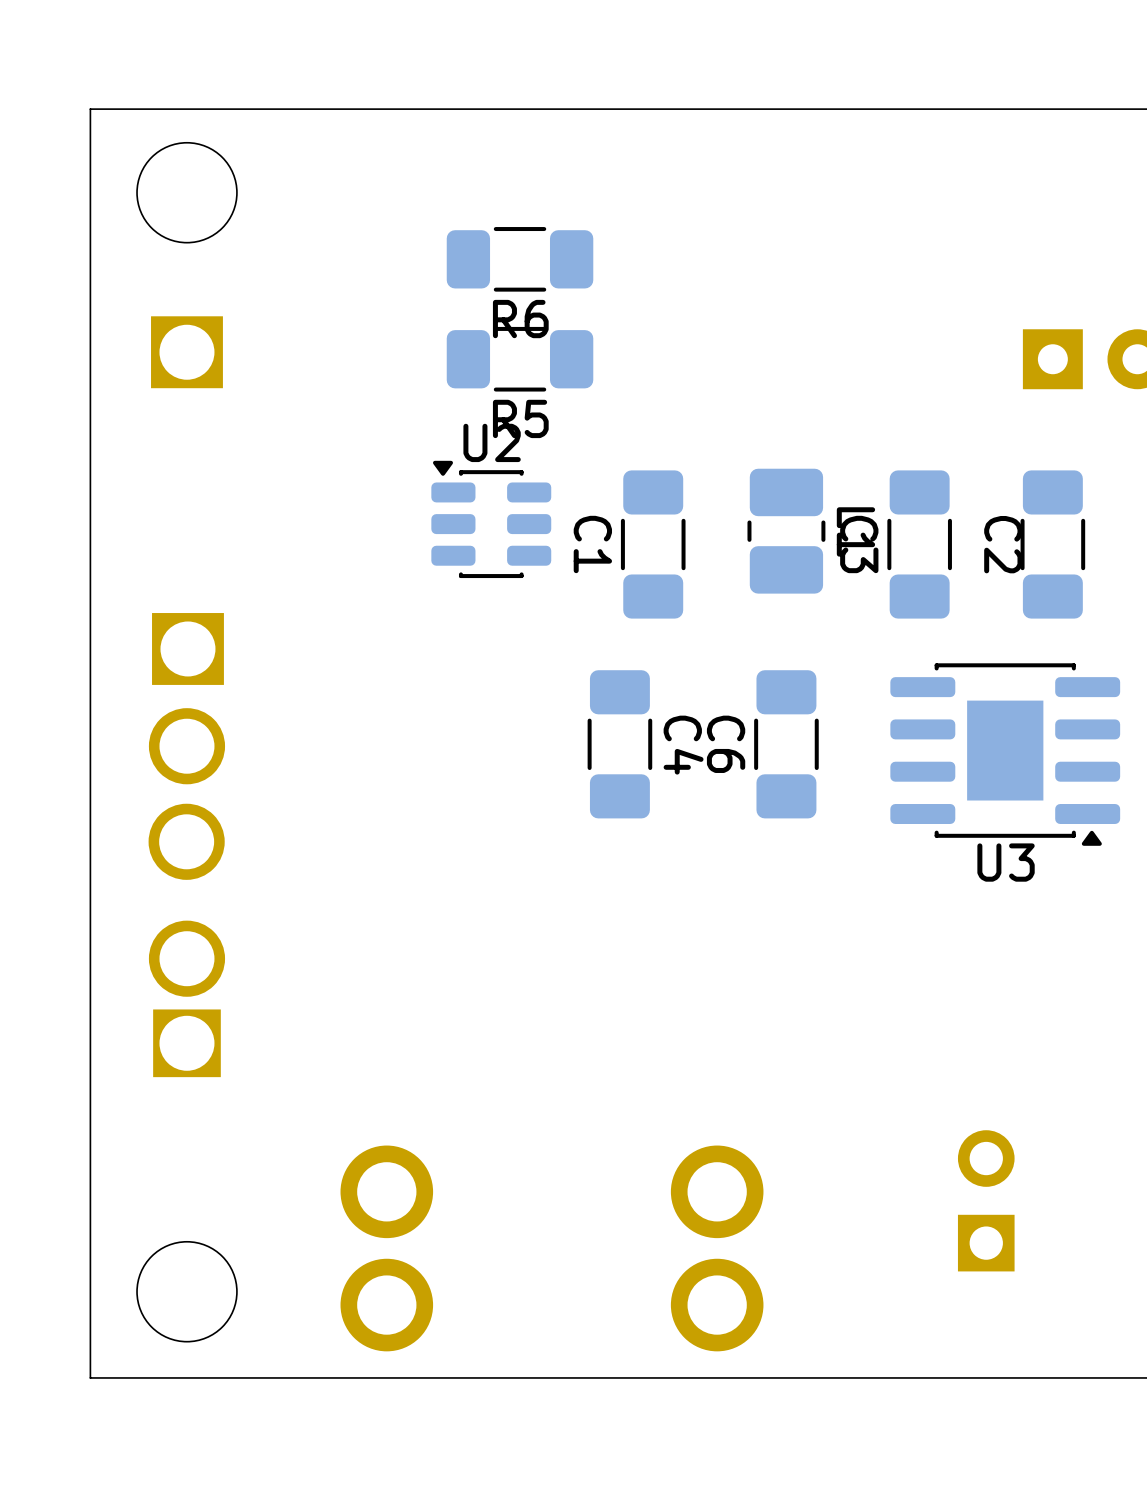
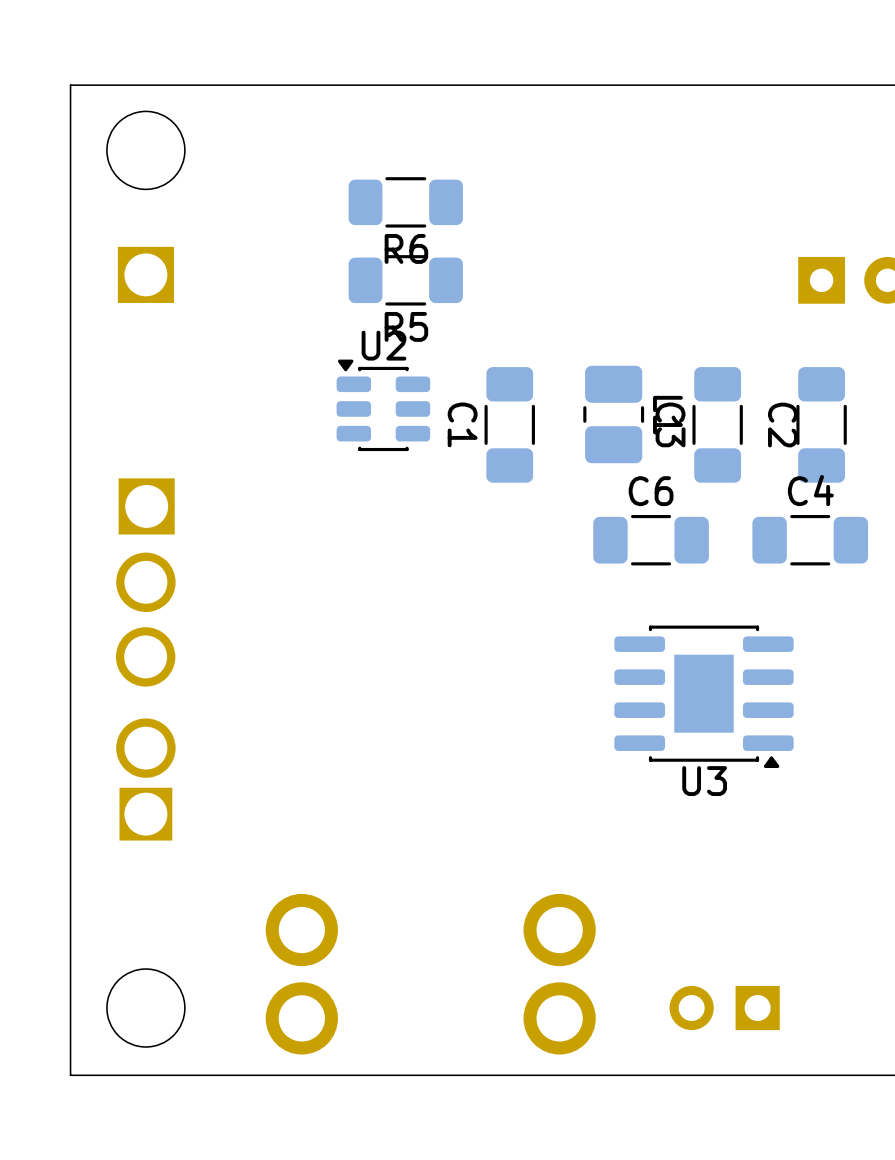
C4 rotation: 0° (619, 744) -> 90° clockwise (810, 540)
C4 position: (619, 744) -> (810, 540)
C6 rotation: 0° (786, 744) -> 90° clockwise (651, 540)
C4 name position: C4 (683, 745) -> C4 (810, 490)
U3 position: (1005, 754) -> (704, 696)
part rotation: 0° (986, 1200) -> 90° counterclockwise (724, 1008)
part position: (986, 1200) -> (724, 1008)

